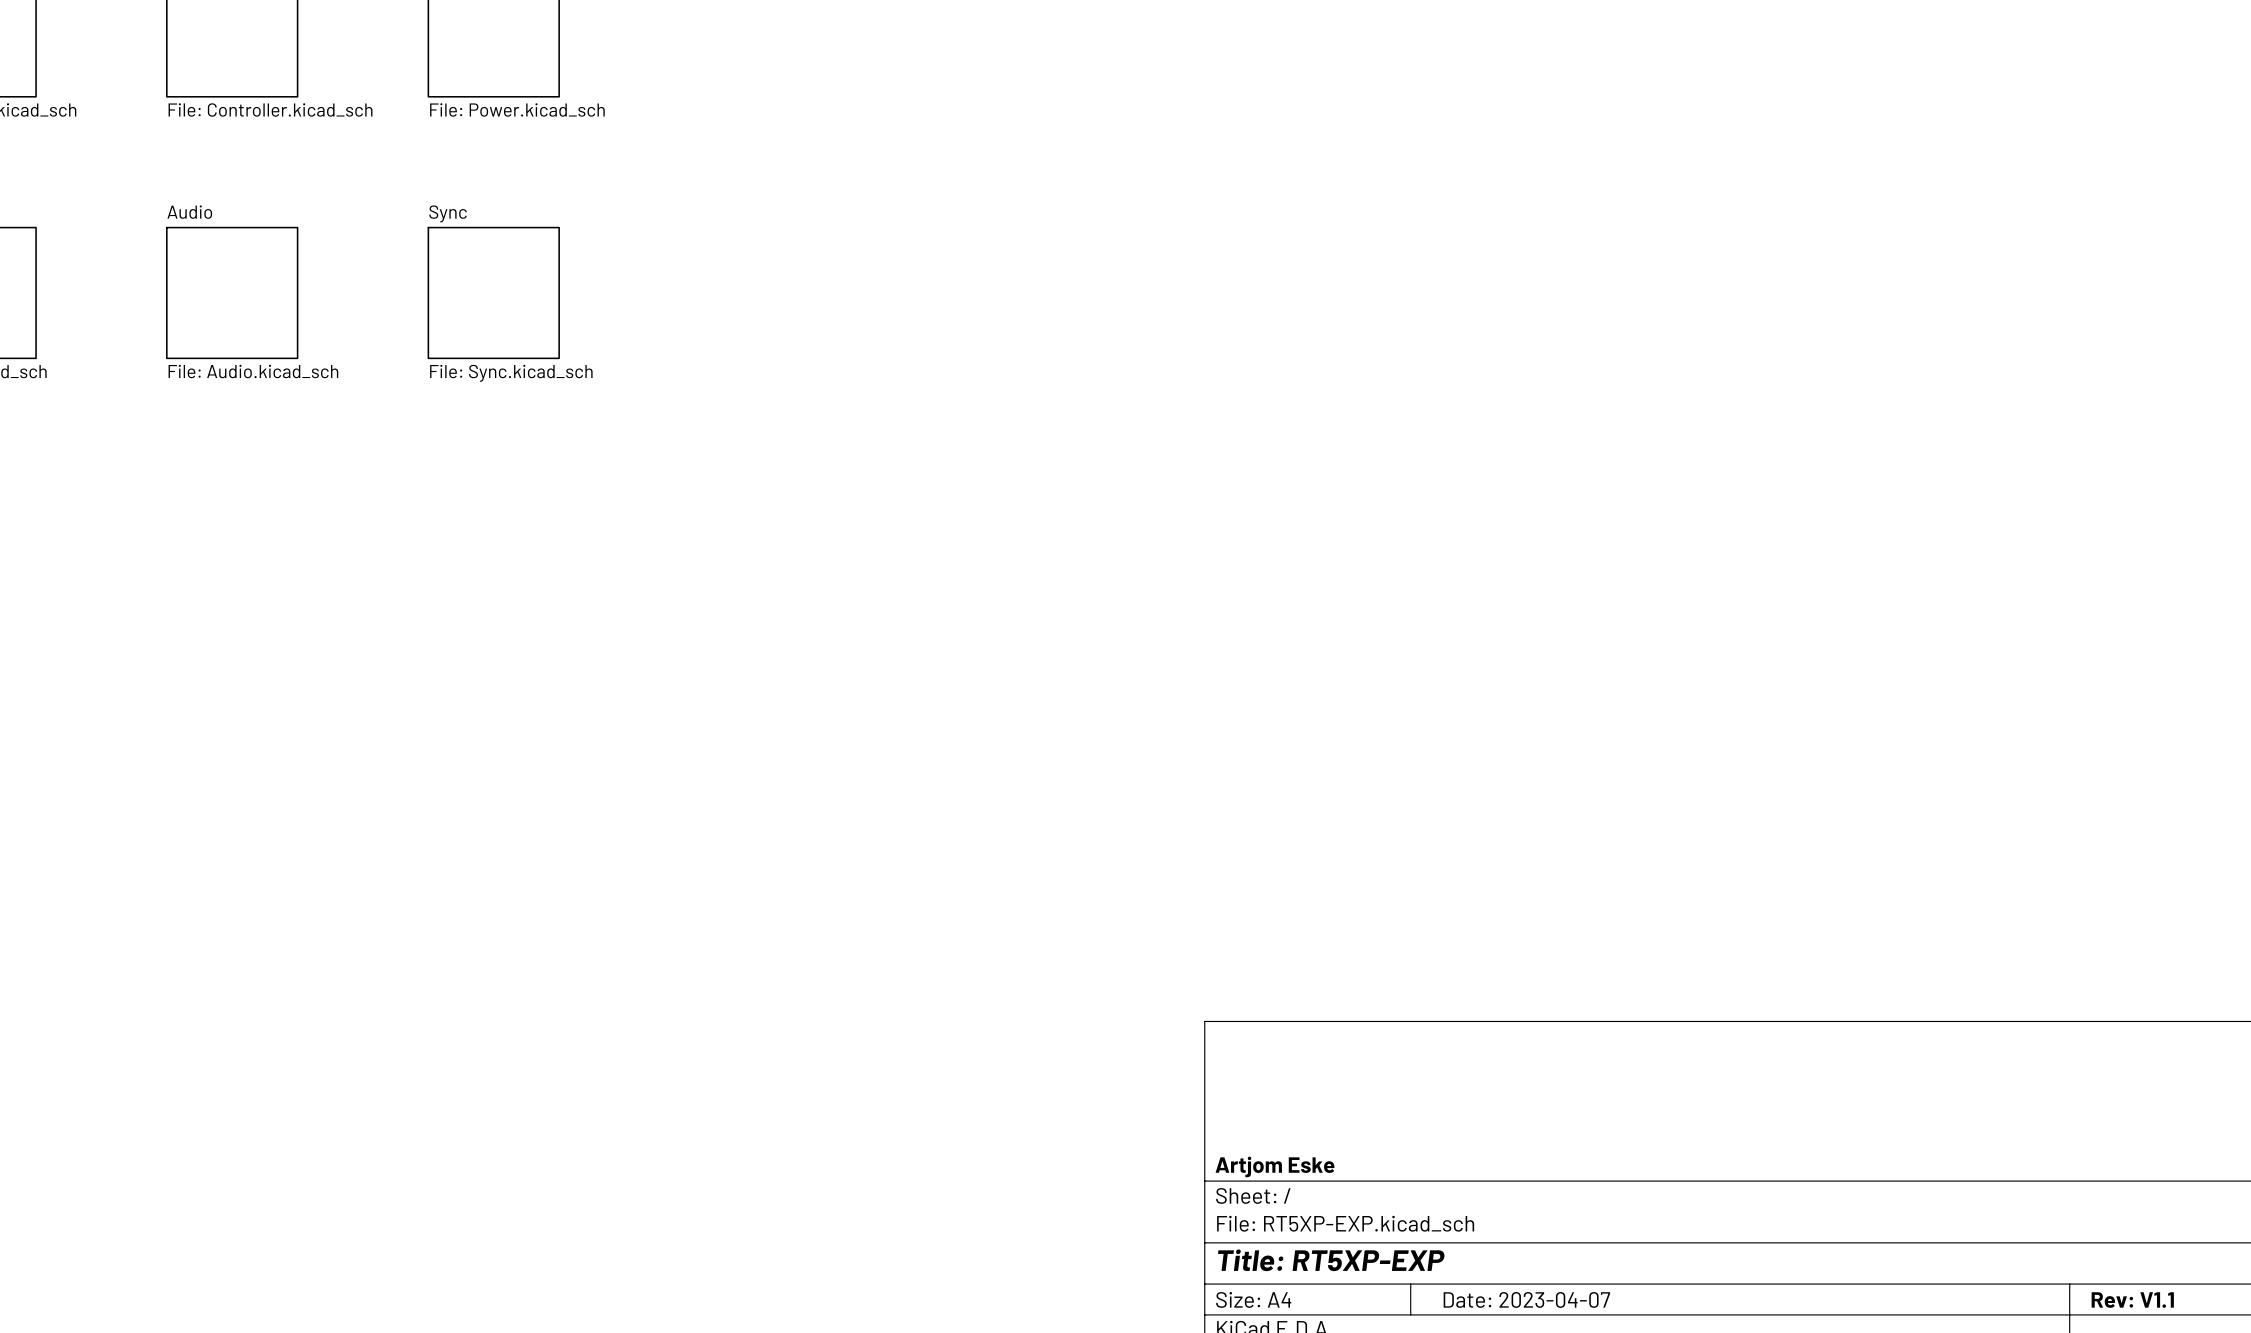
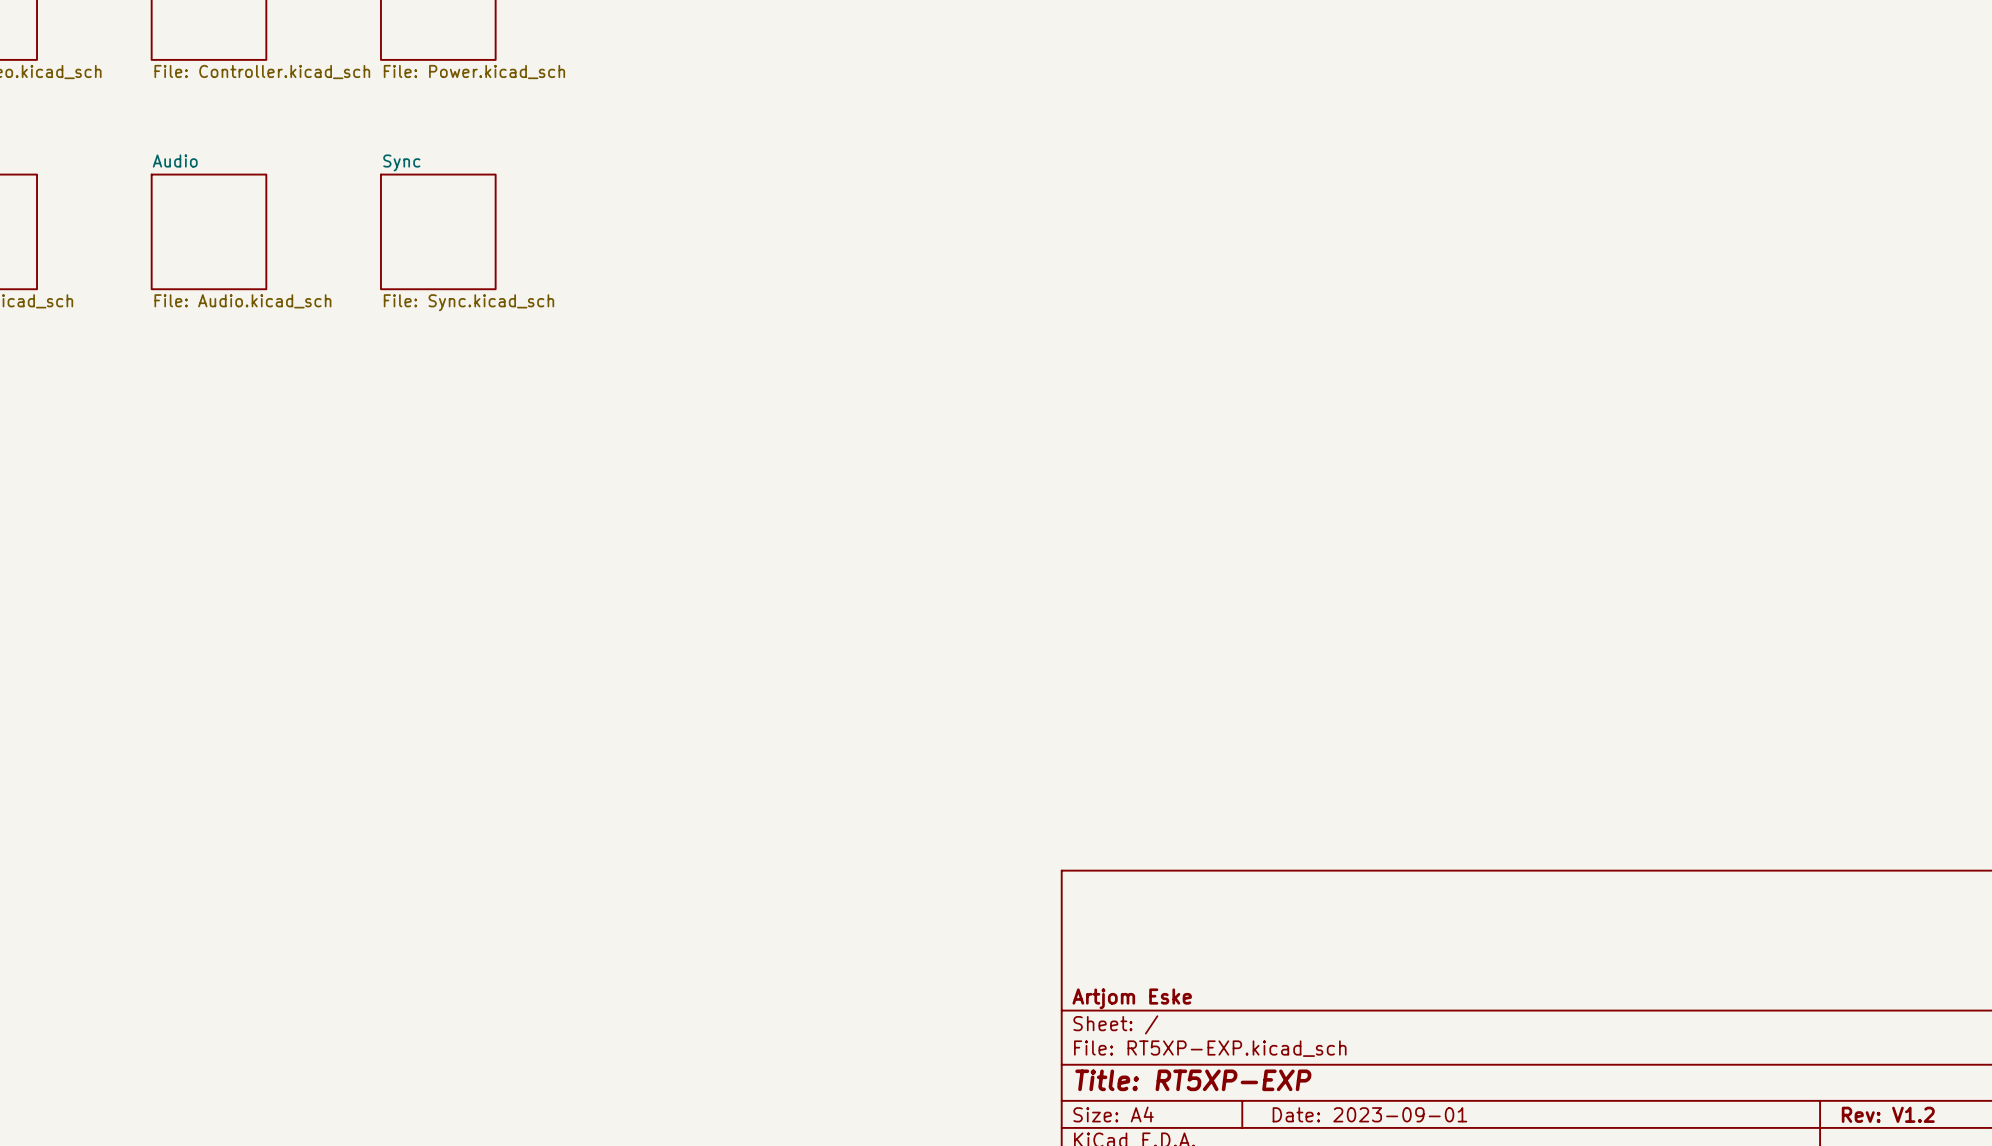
title block: Date: 2023-04-07 (1526, 1299) -> Date: 2023-09-01 (1369, 1114)
title block: Rev: V1.1 (2132, 1300) -> Rev: V1.2 (1888, 1114)

